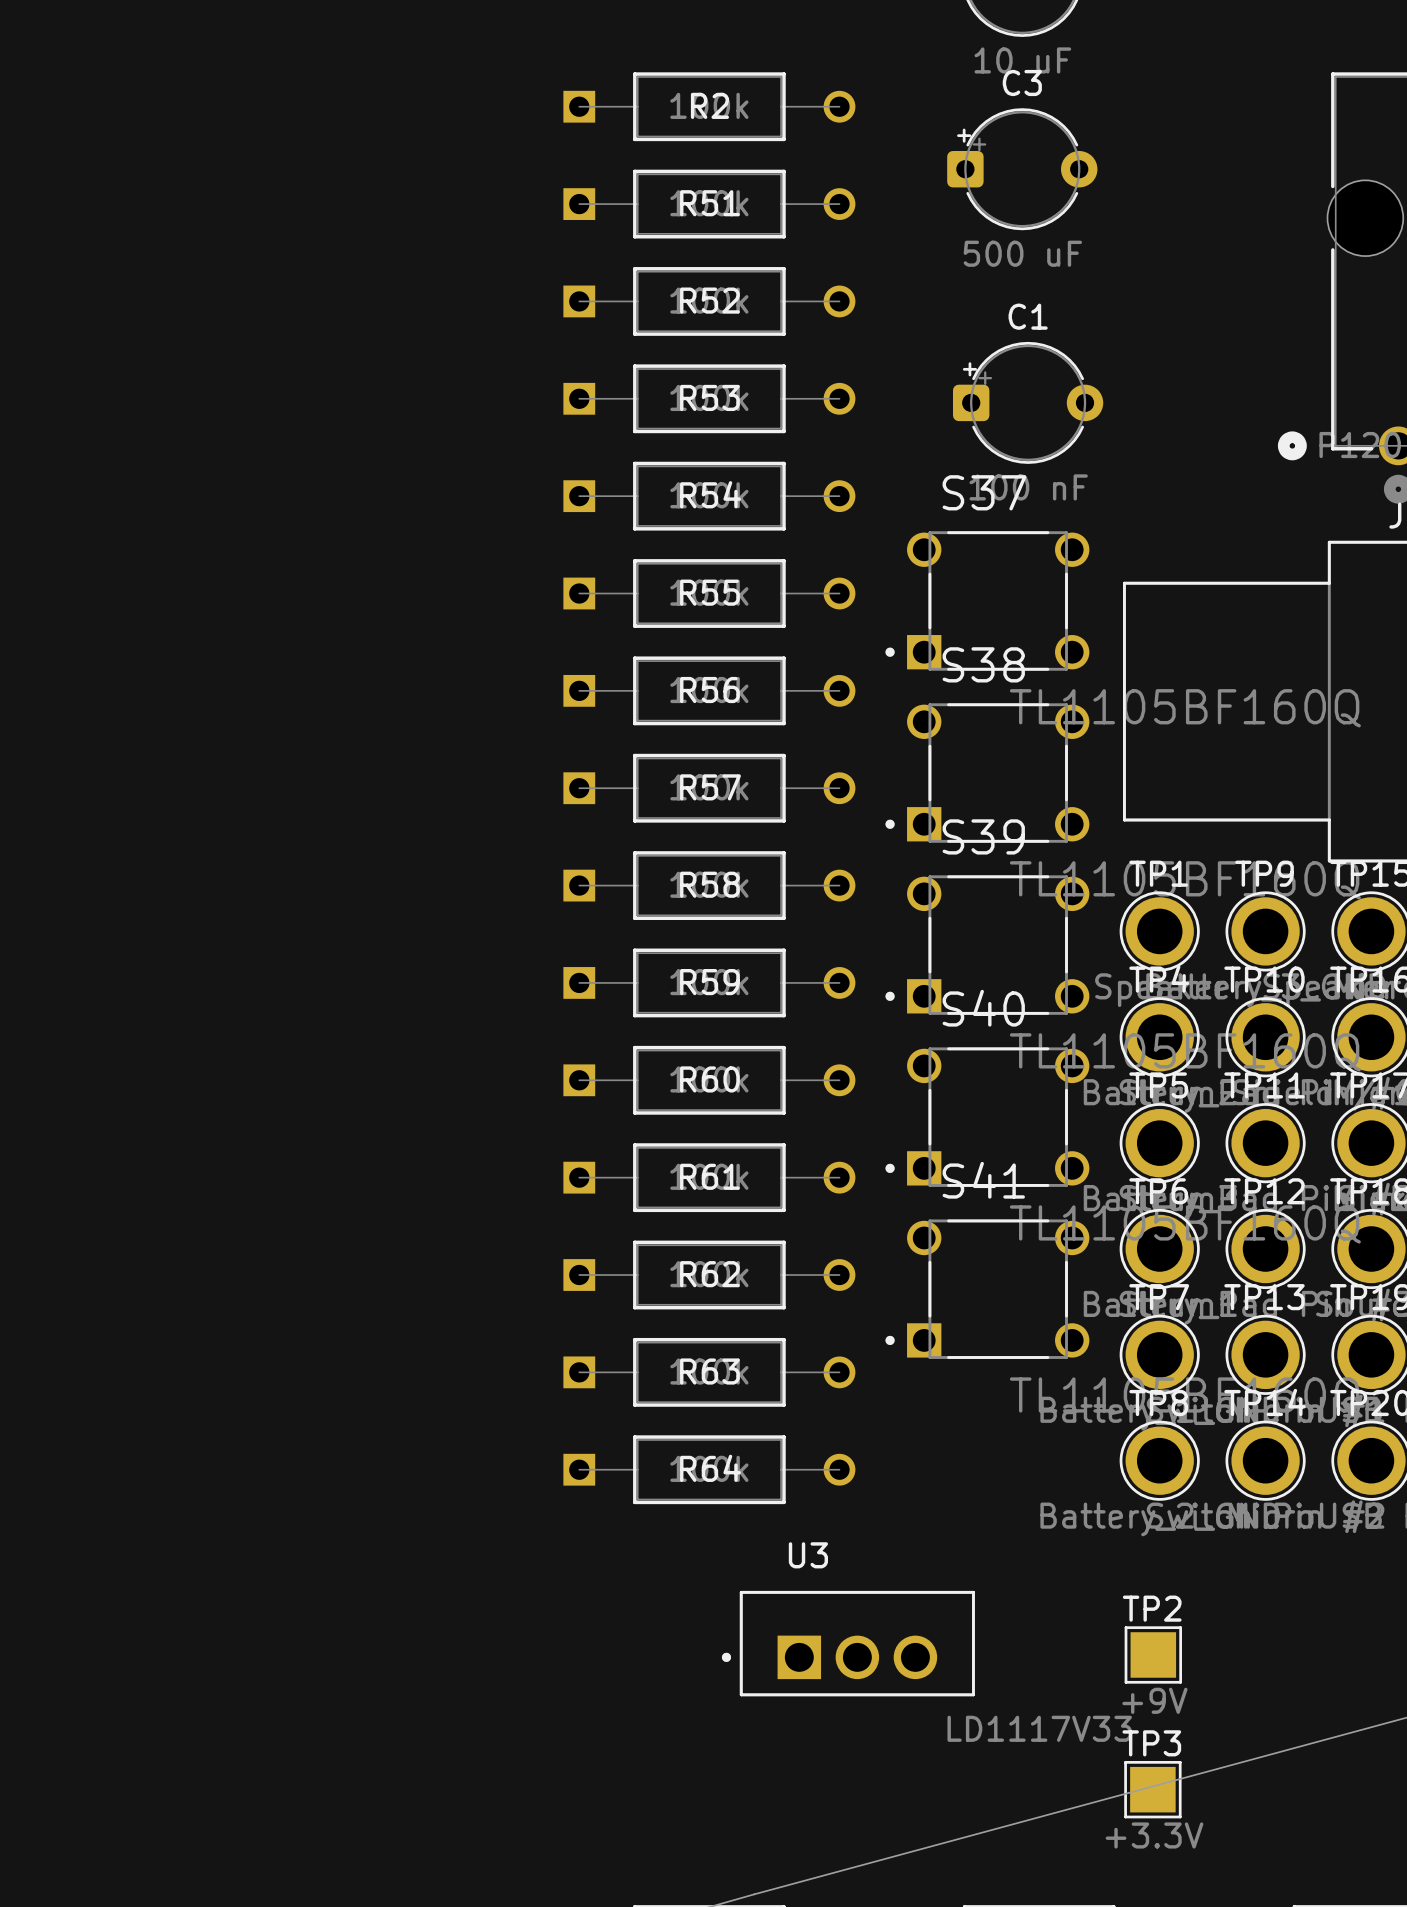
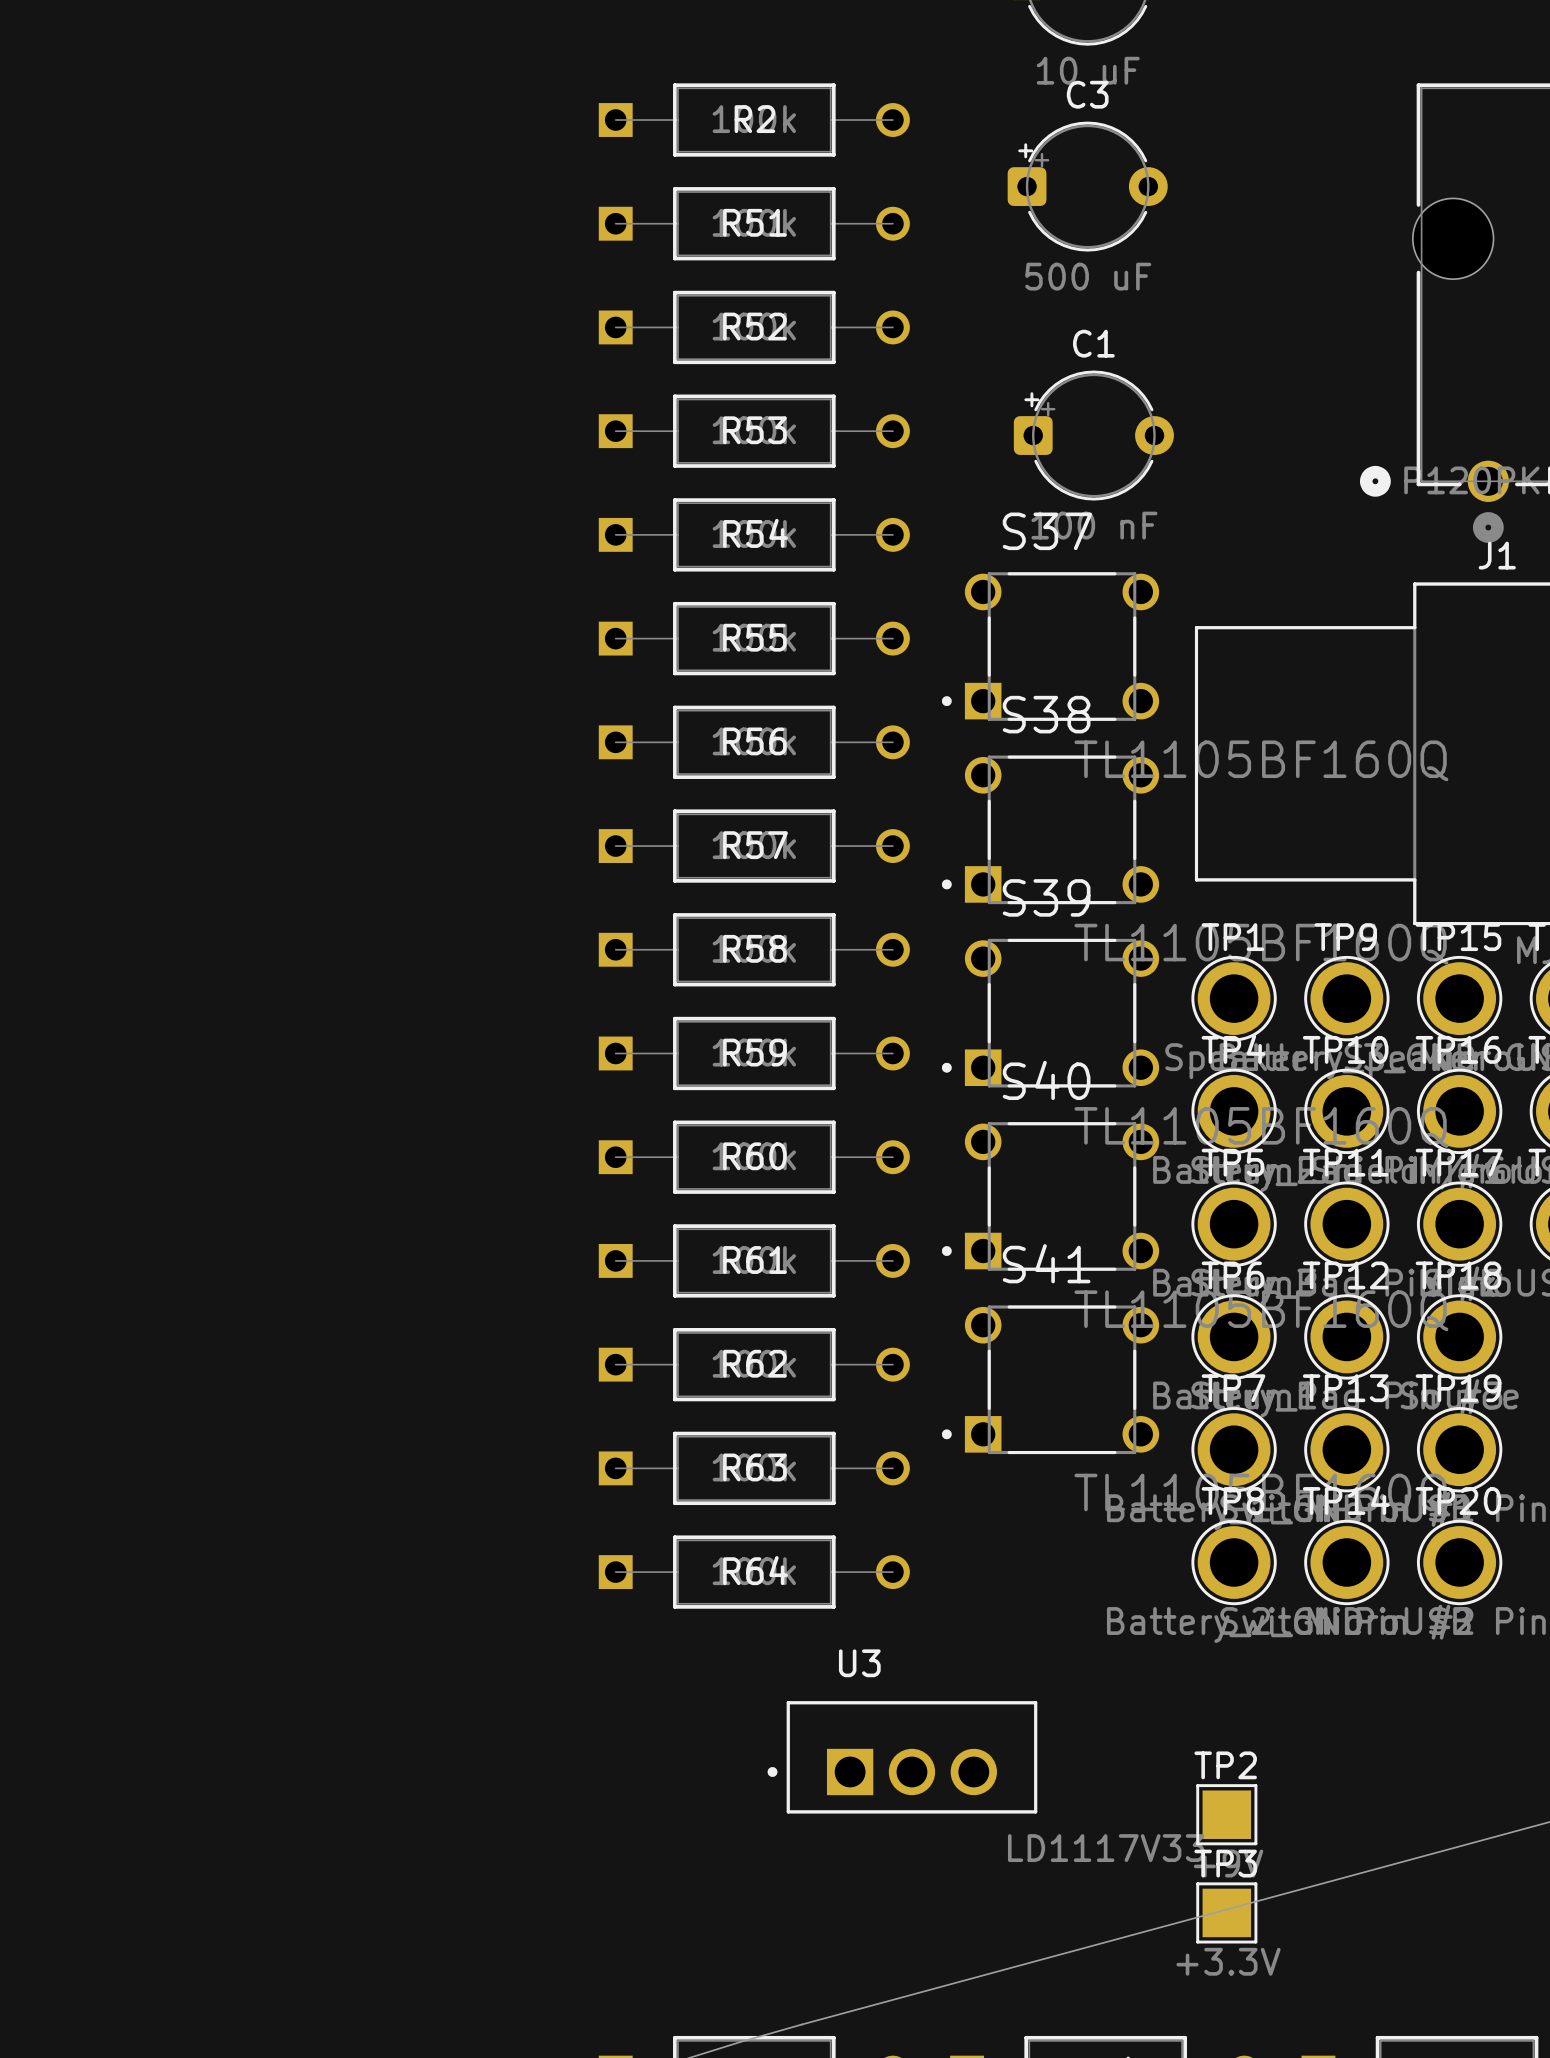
TP2 position: (1153, 1654) -> (1226, 1814)

